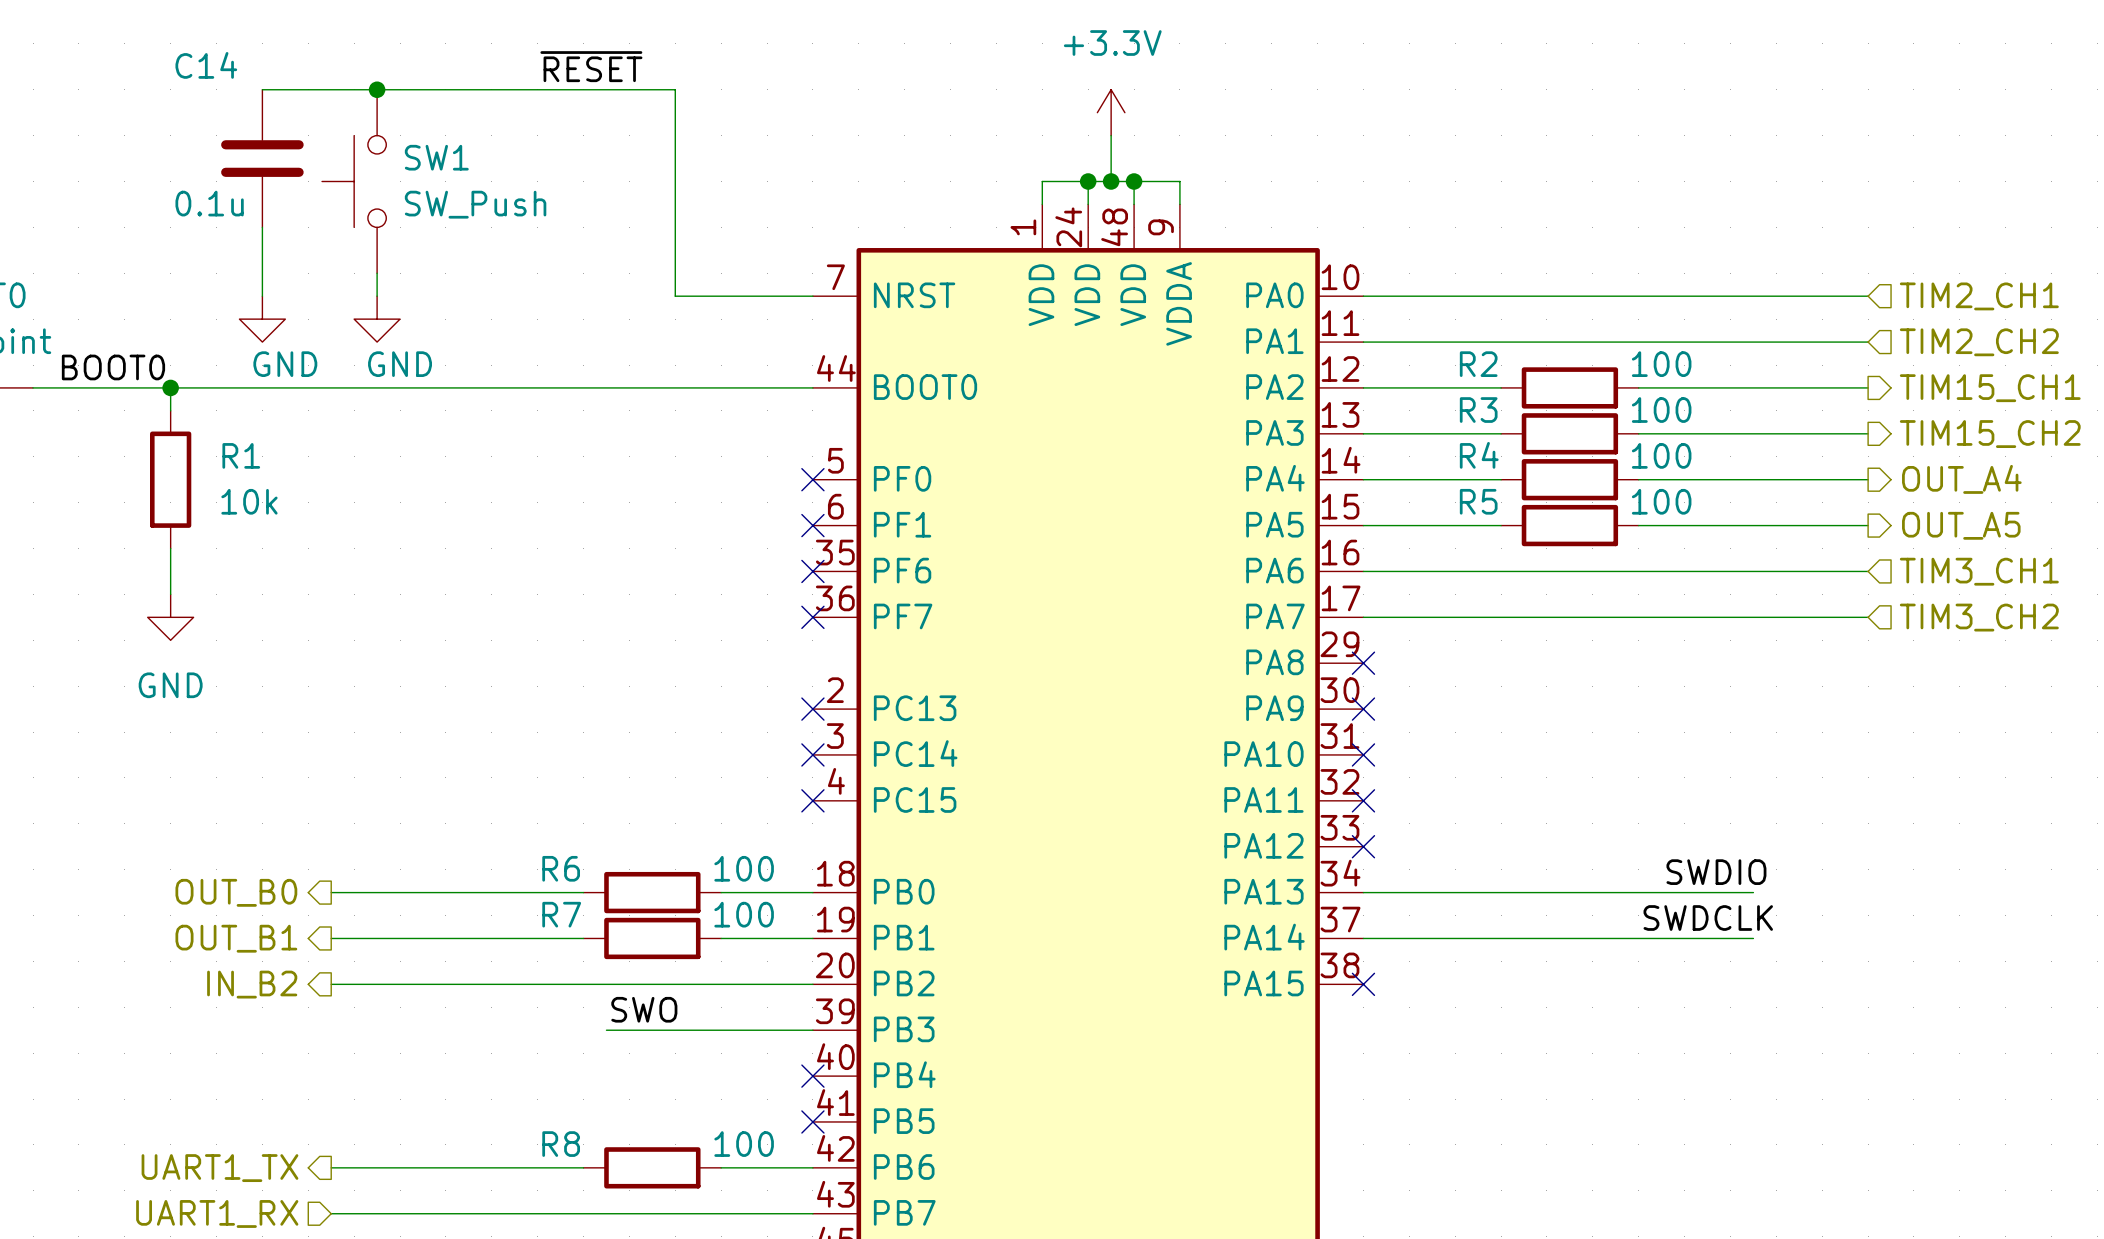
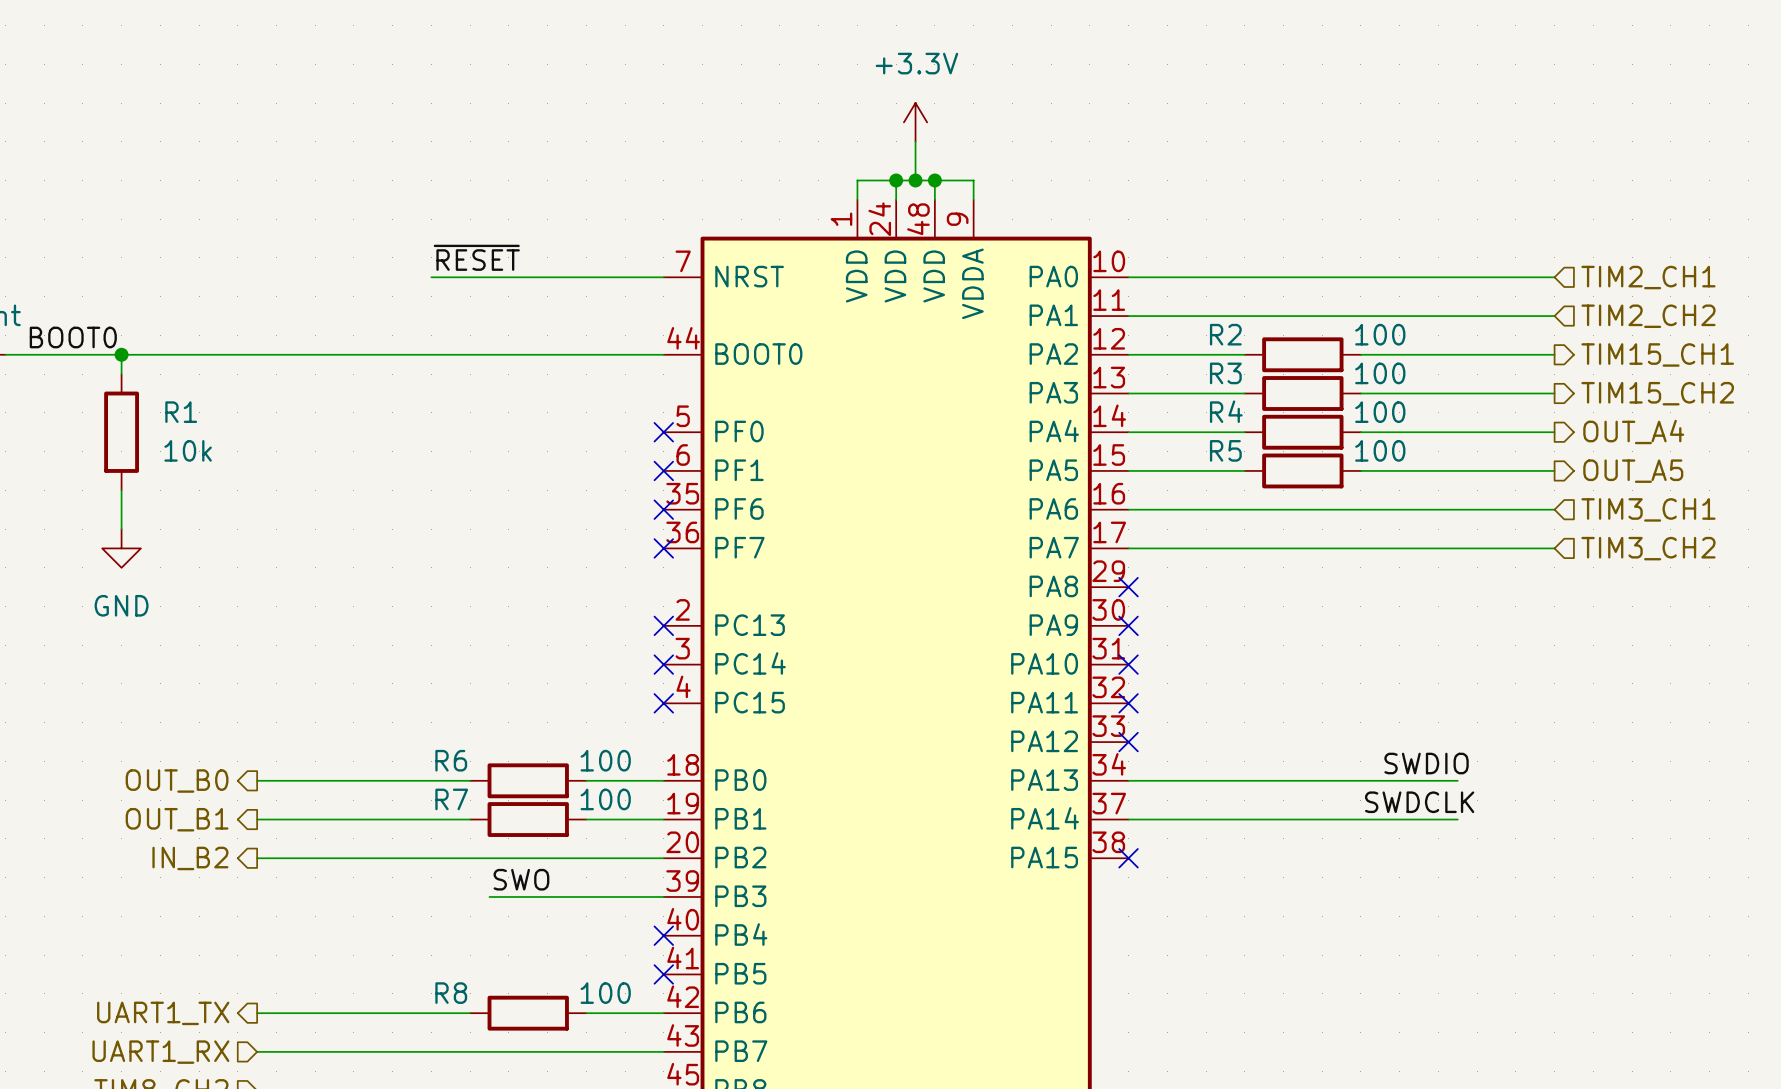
label position: ~{RESET} (591, 66) -> ~{RESET} (476, 257)
wire: (262, 89) (675, 89) (675, 296) -> (431, 277) (547, 277)
junction: (377, 89) -> none
C14: 0.1u (262, 158) -> none
SW1: SW_Push (354, 181) -> none
wire: (262, 227) (262, 296) -> none
wire: (377, 273) (377, 296) -> none
power symbol: GND (262, 319) -> none
power symbol: GND (377, 319) -> none

